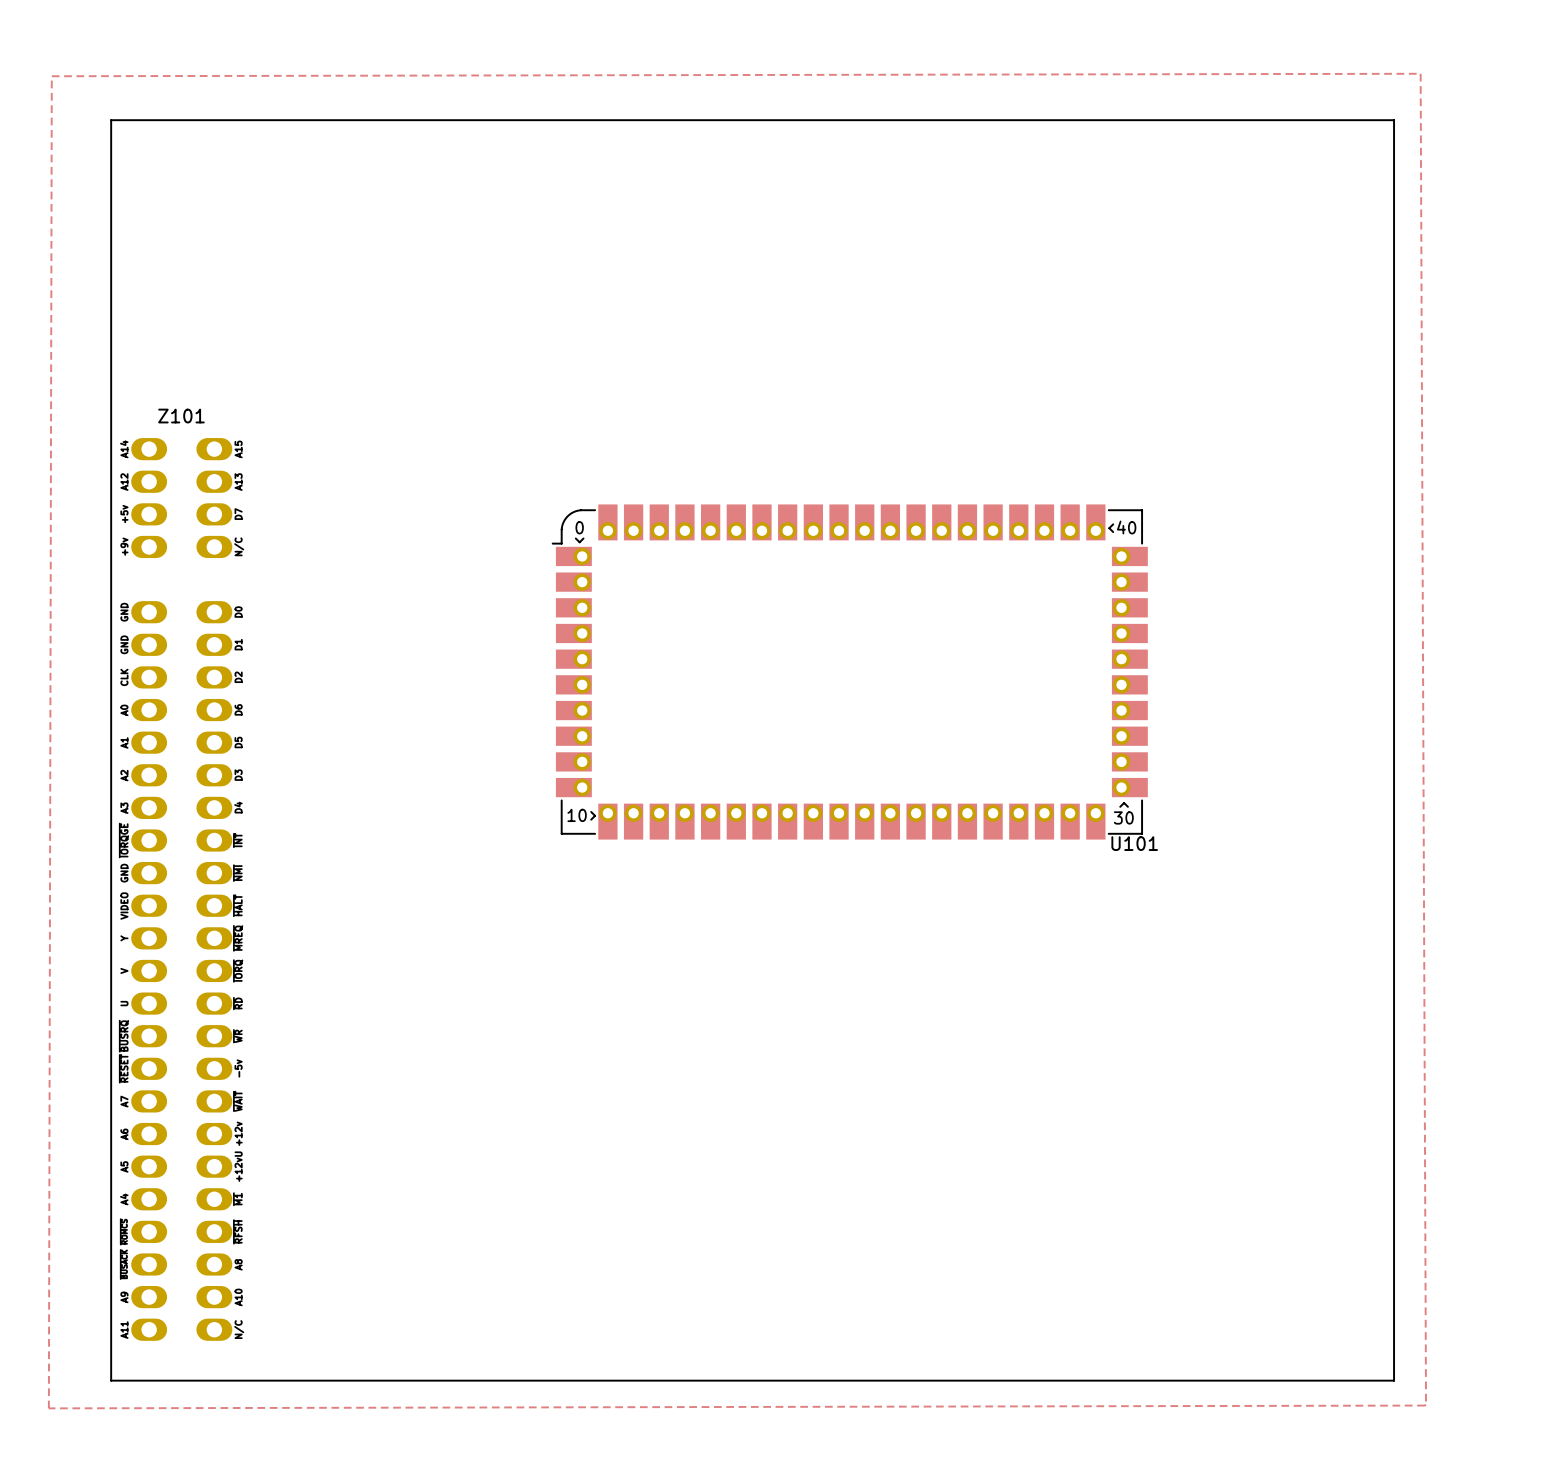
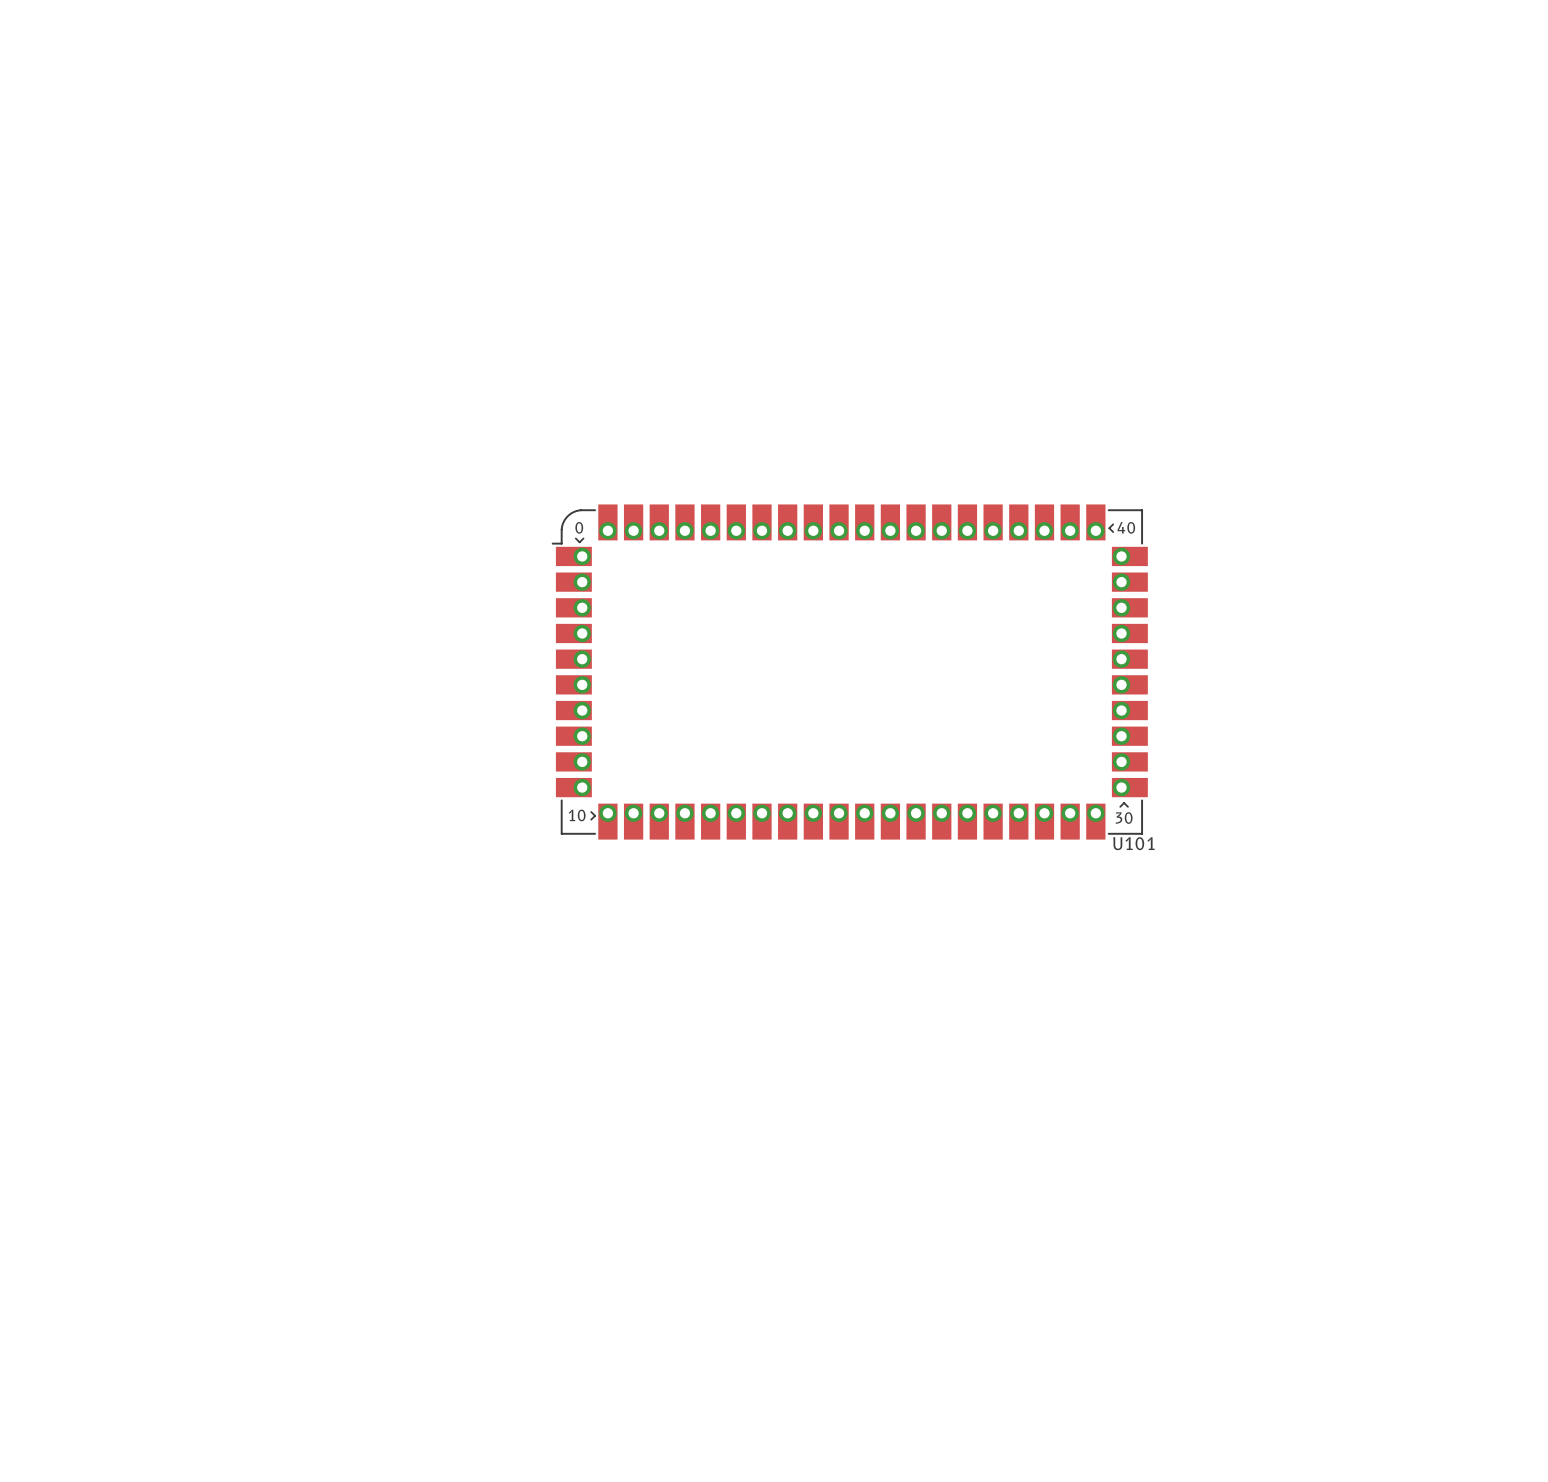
top zone outline: (1420, 73) (51, 76) (48, 1408) (1426, 1404) (1420, 73) -> none
board edge: (111, 120) (1394, 120) (1394, 1380) (111, 1380) (111, 120) -> none
Z101: (181, 889) -> none

